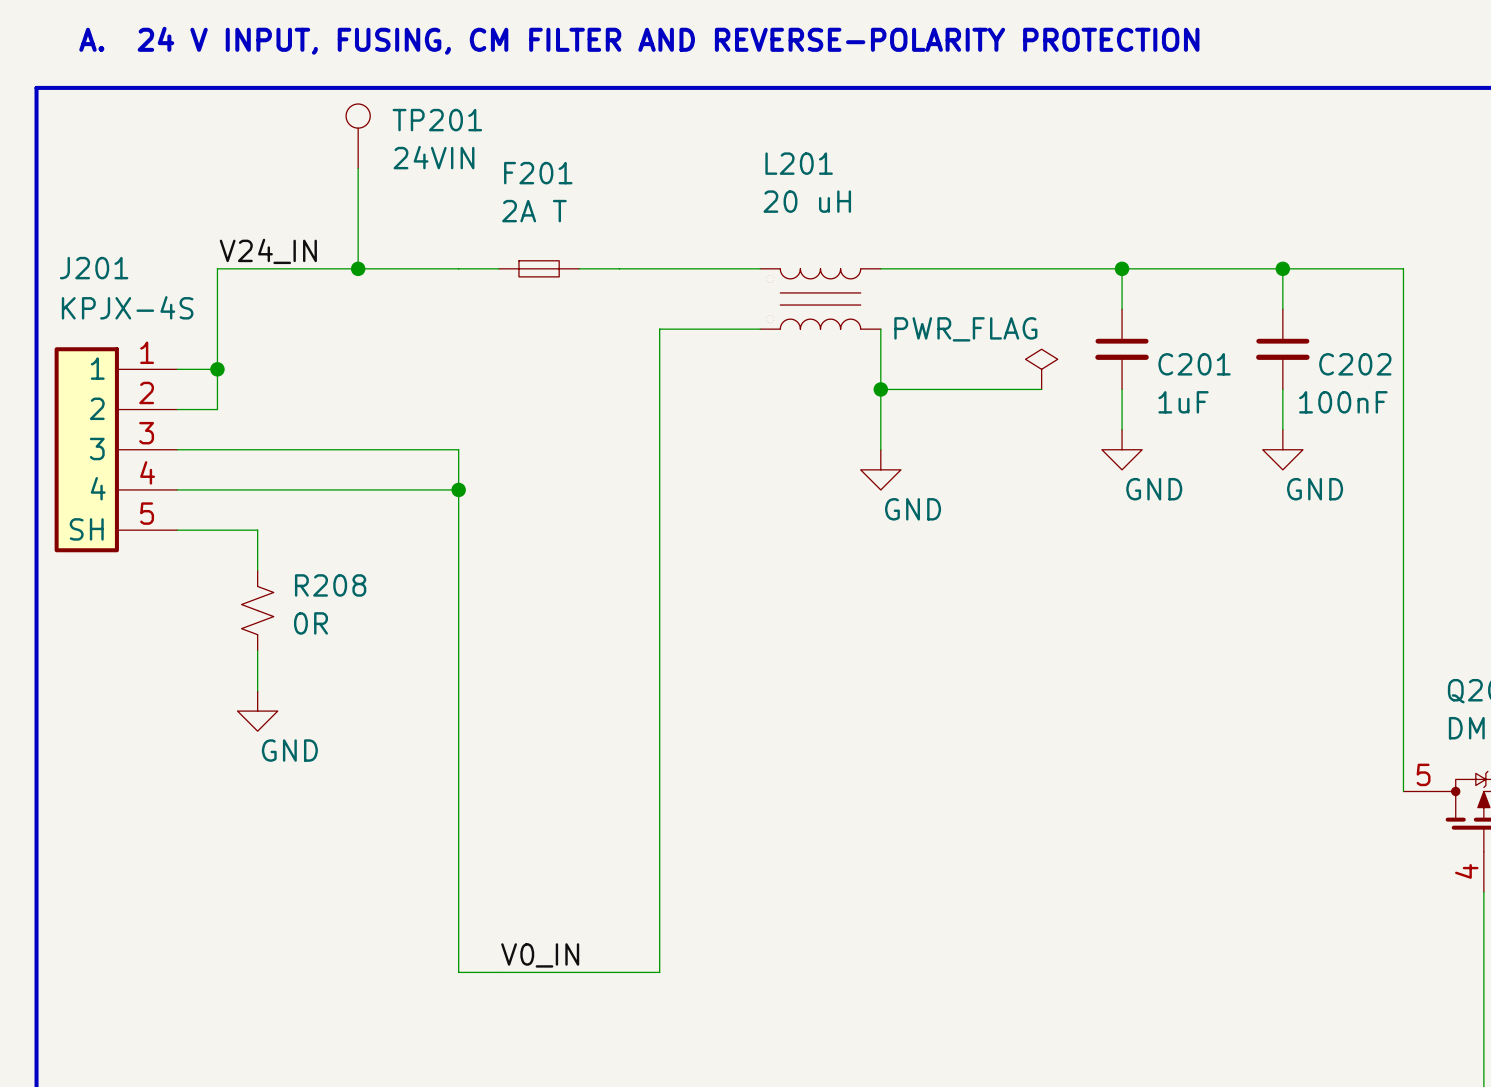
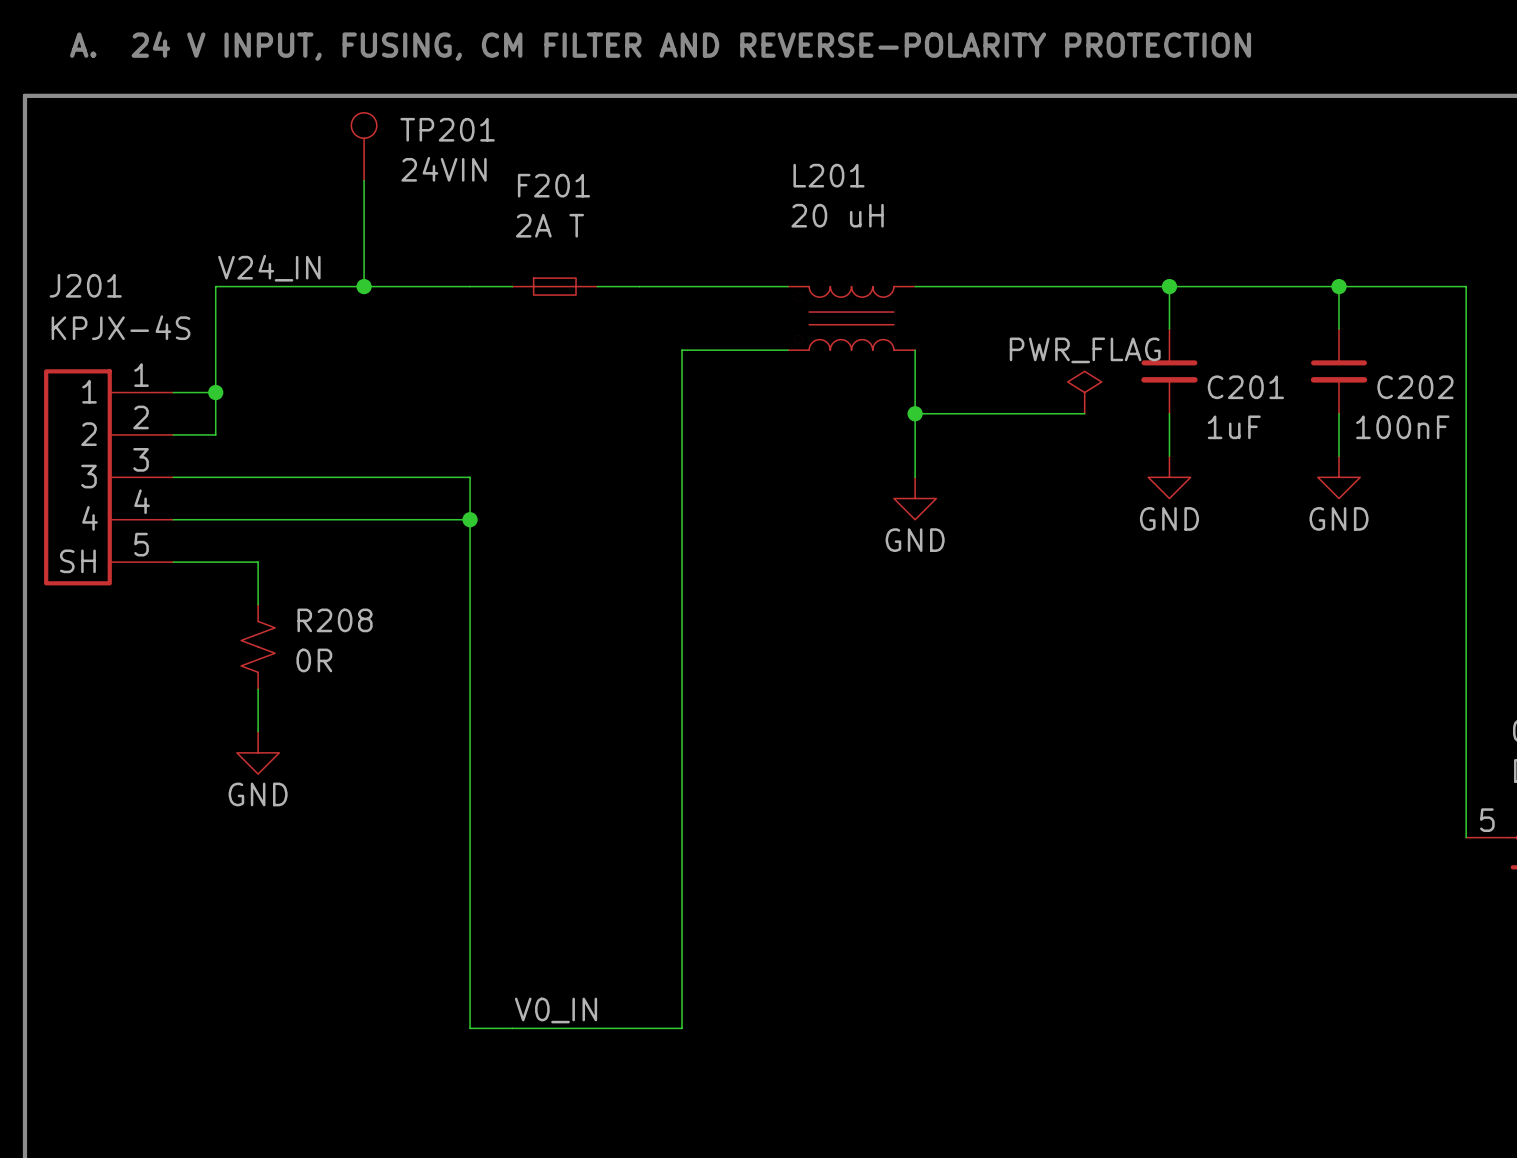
power symbol text position: PWR_FLAG (965, 329) -> PWR_FLAG (1085, 350)
power symbol text position: GND (1154, 489) -> GND (1169, 518)
power symbol text position: GND (1315, 489) -> GND (1339, 518)
power symbol text position: GND (913, 509) -> GND (915, 540)
power symbol text position: GND (289, 750) -> GND (258, 794)

